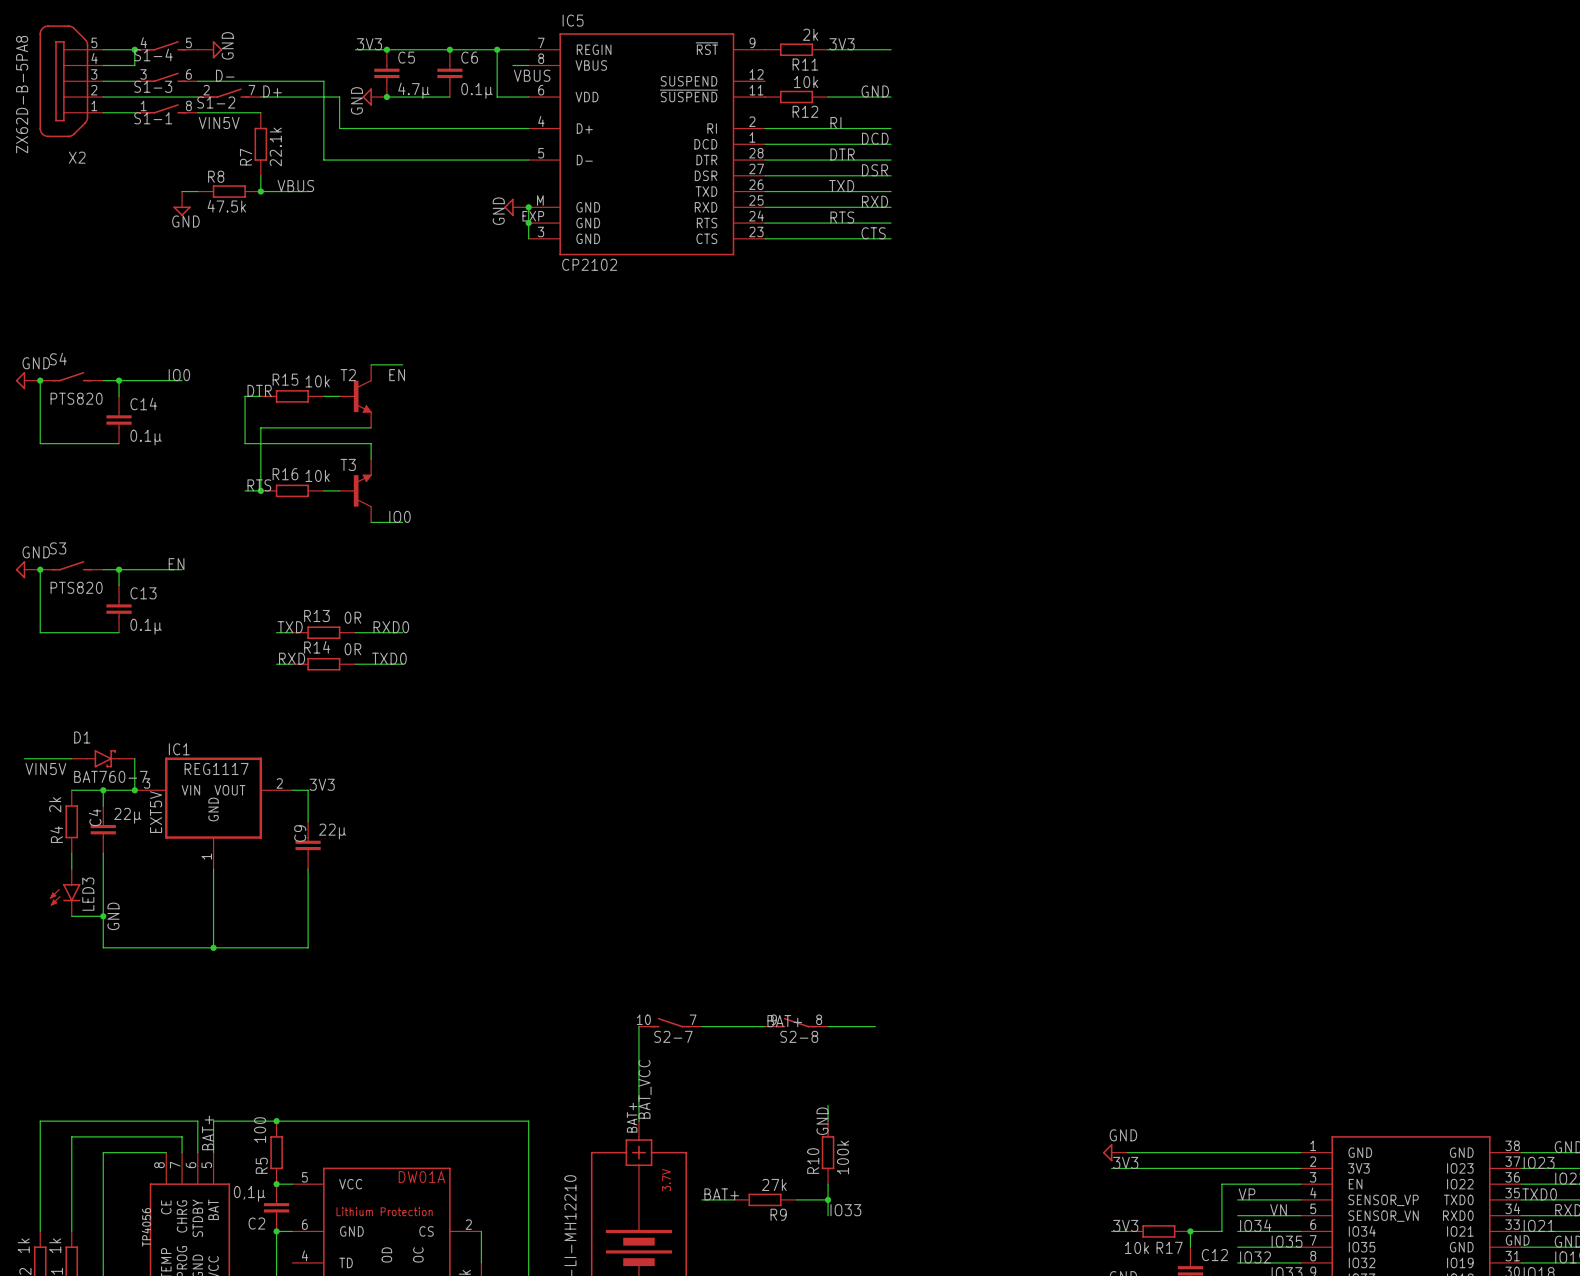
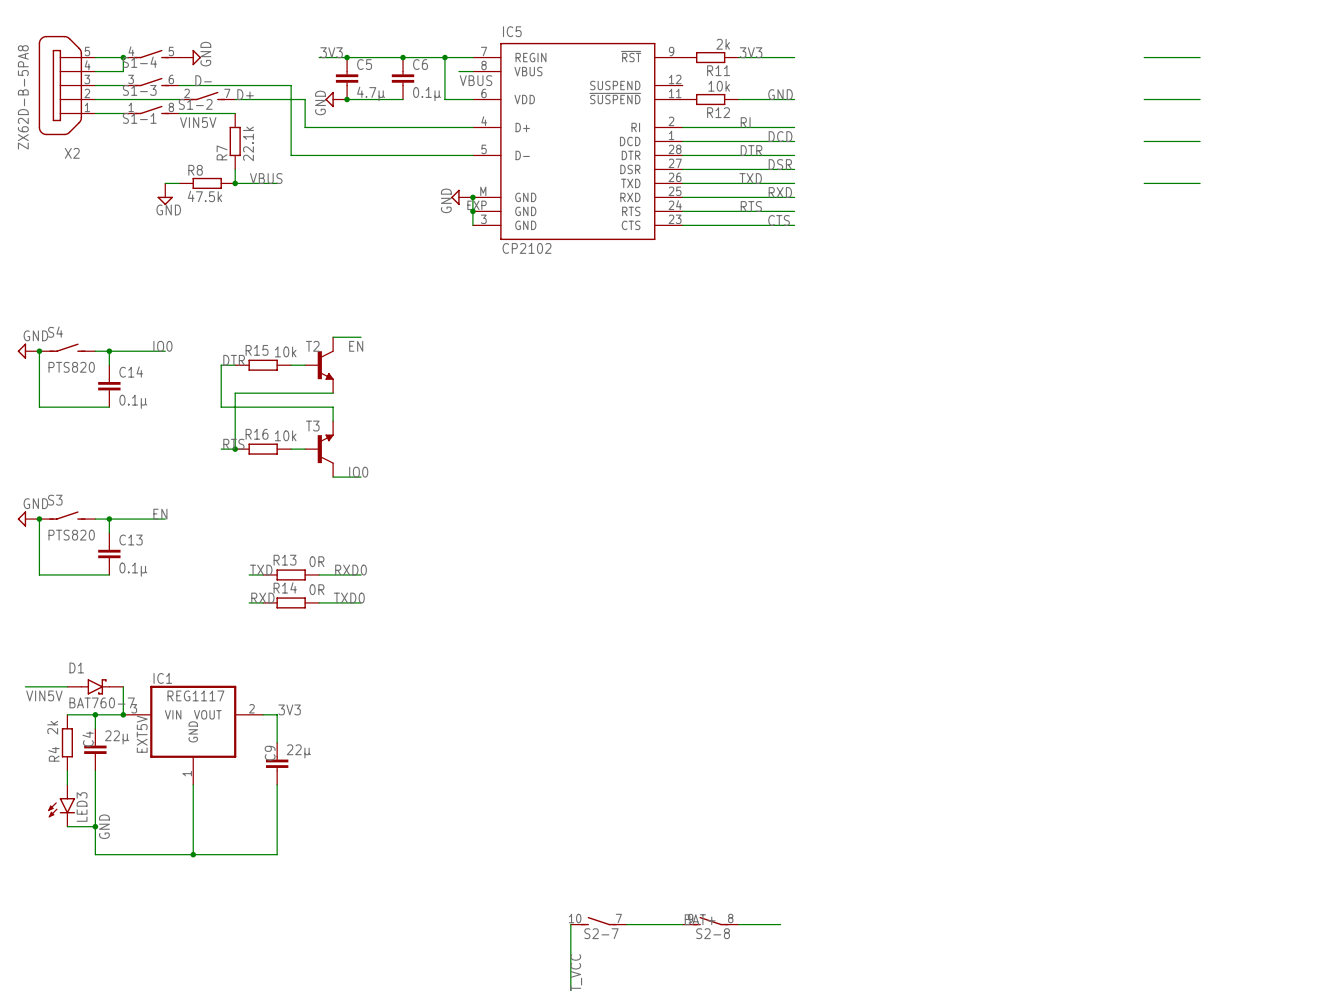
wire: none -> (1144, 57) (1200, 57)
wire: none -> (1144, 99) (1200, 99)
wire: none -> (1144, 141) (1200, 141)
wire: none -> (1144, 183) (1200, 183)

